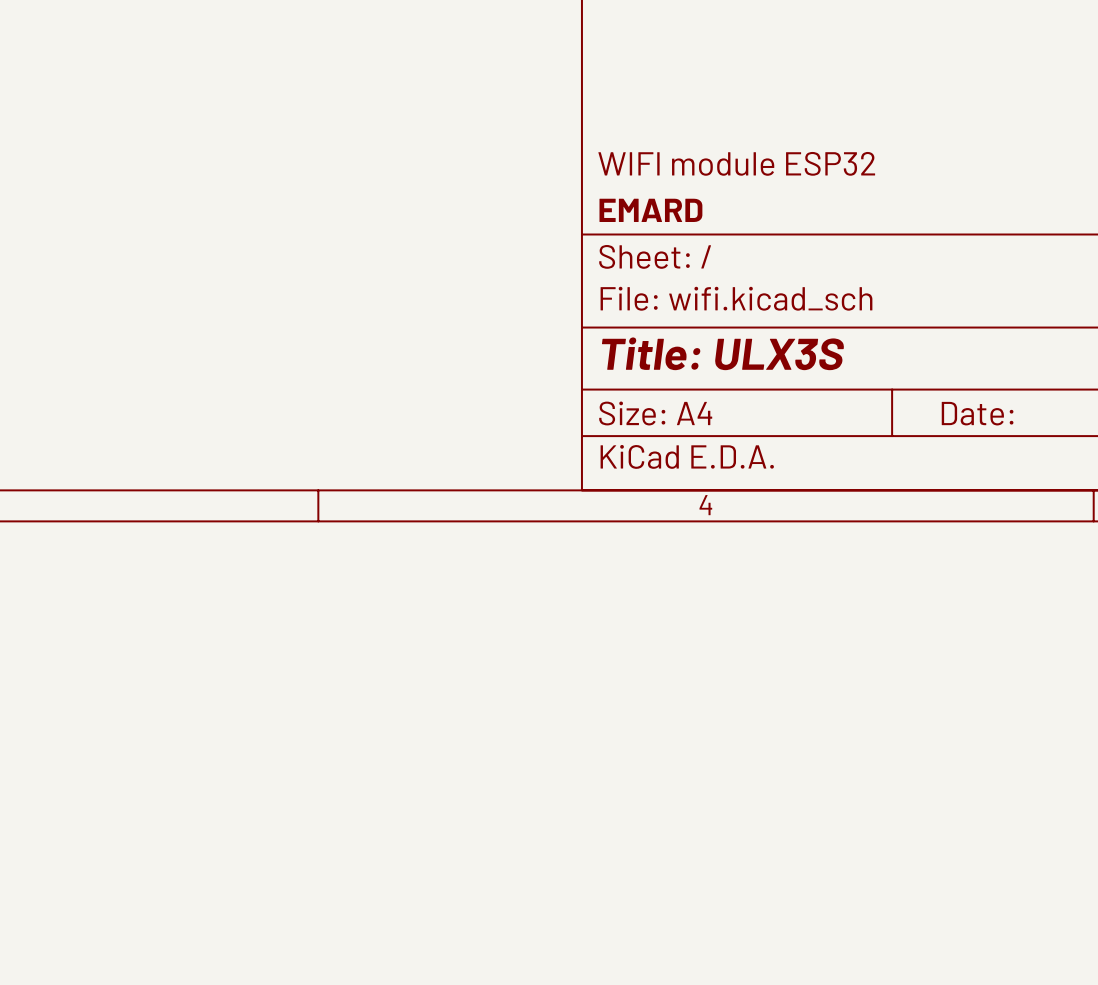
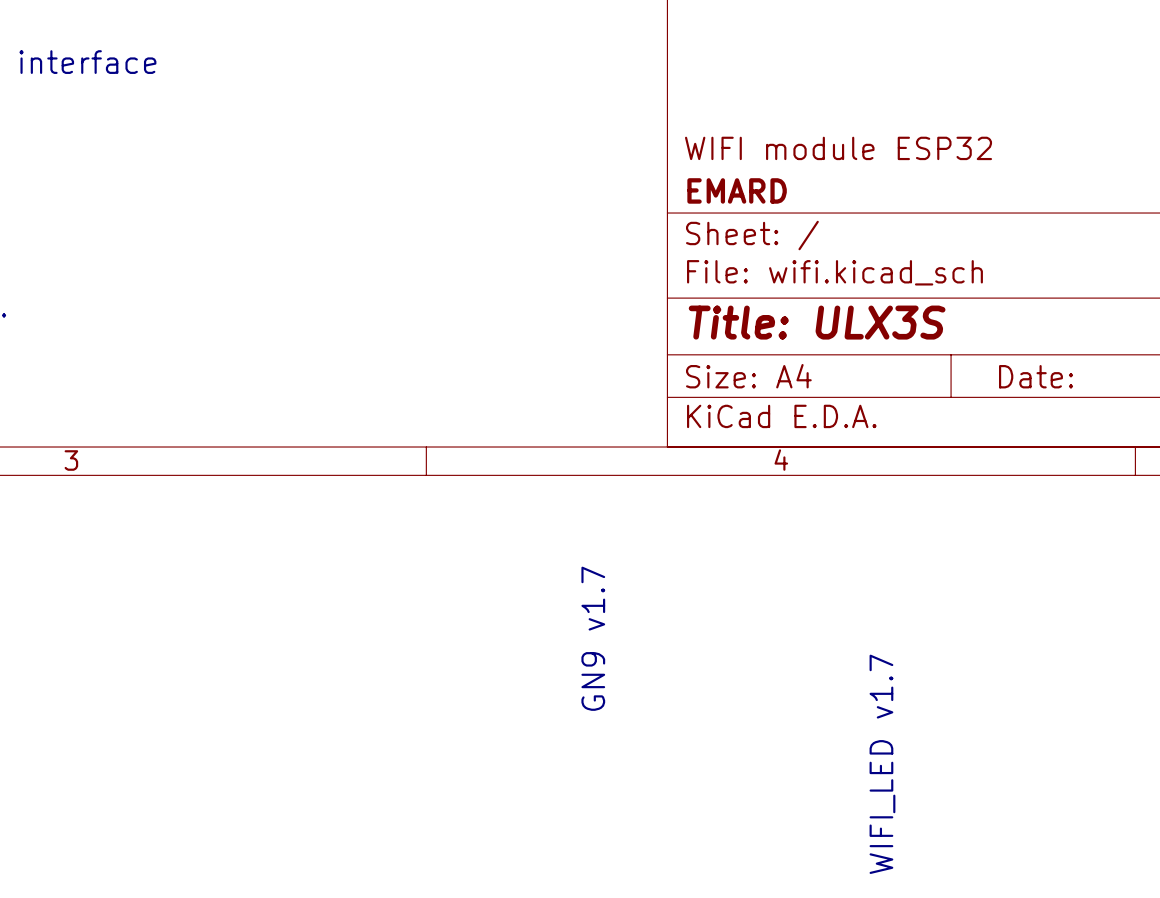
text: none -> GN9 v1.7 (593, 638)
text: none -> WIFI_LED v1.7 (882, 764)

